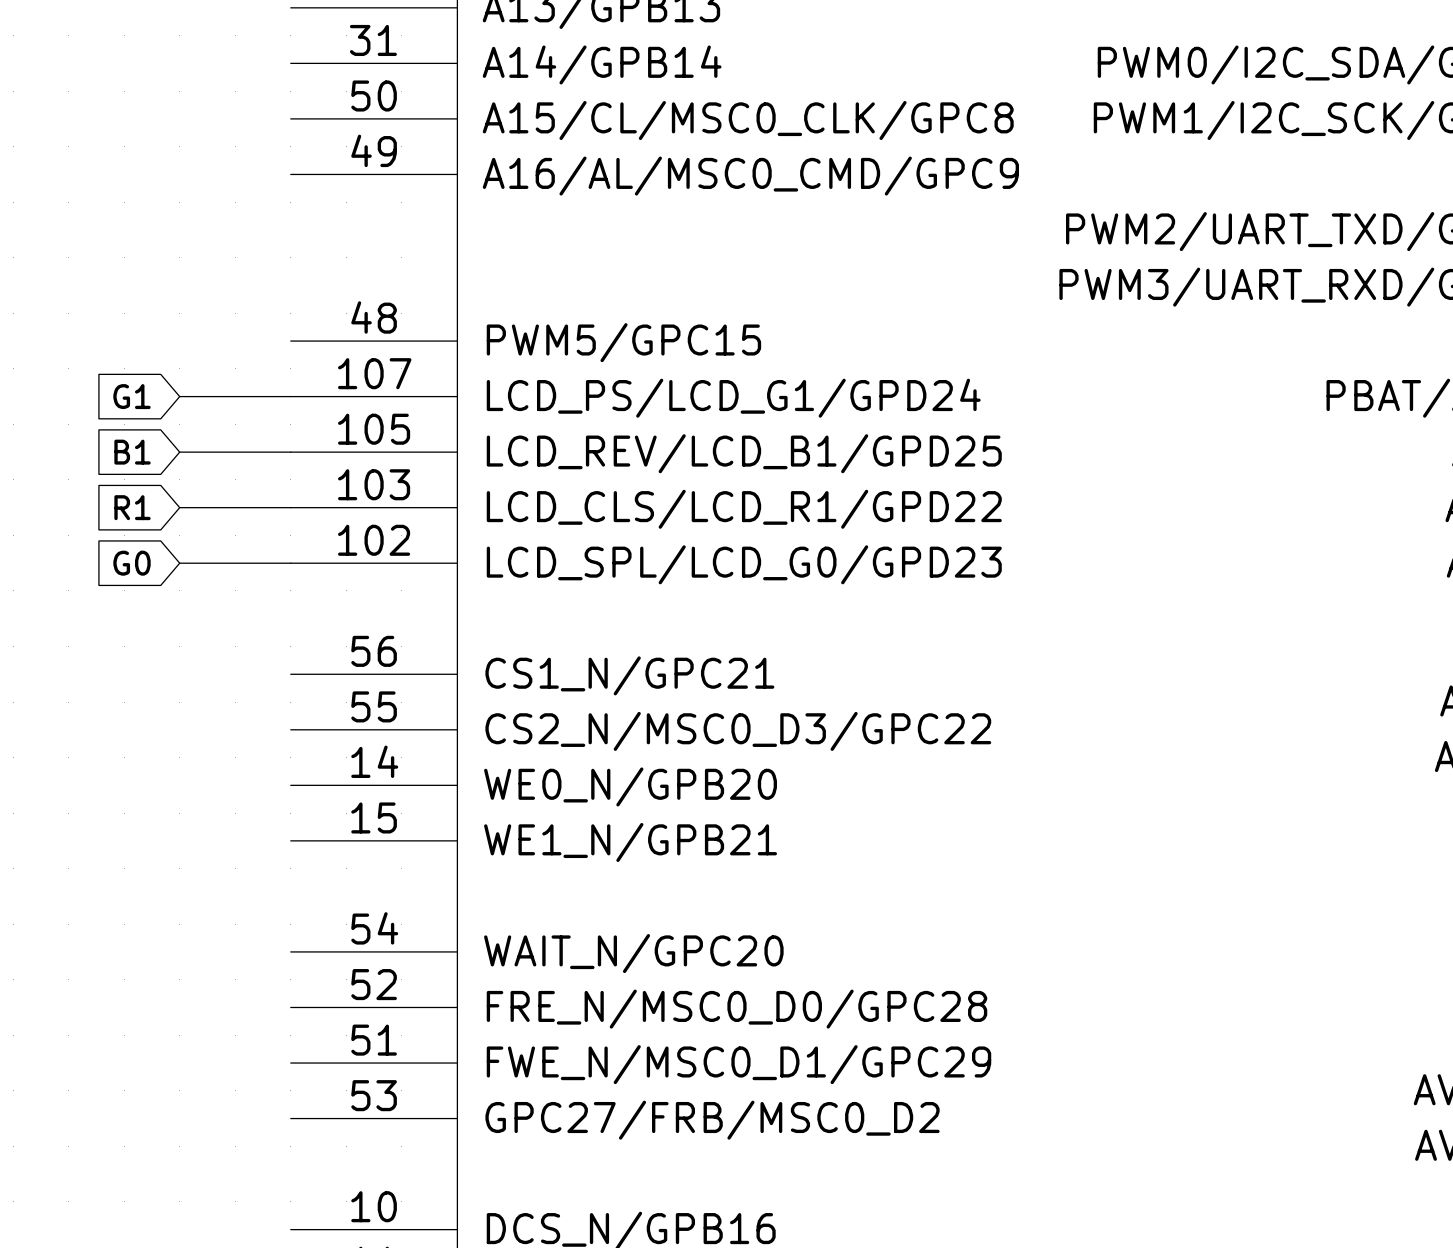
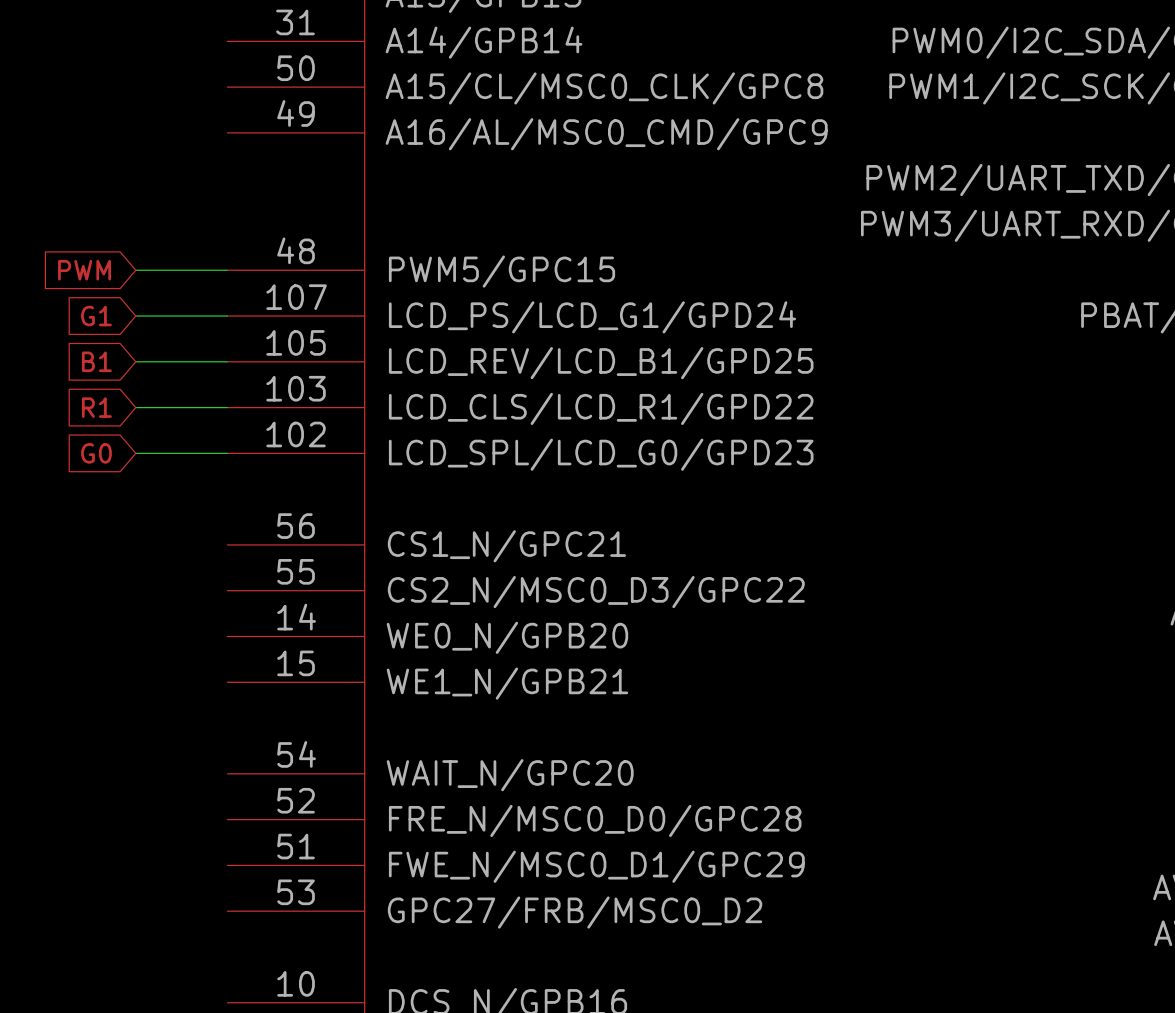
global label: none -> PWM (84, 270)
wire: none -> (135, 270) (227, 270)

